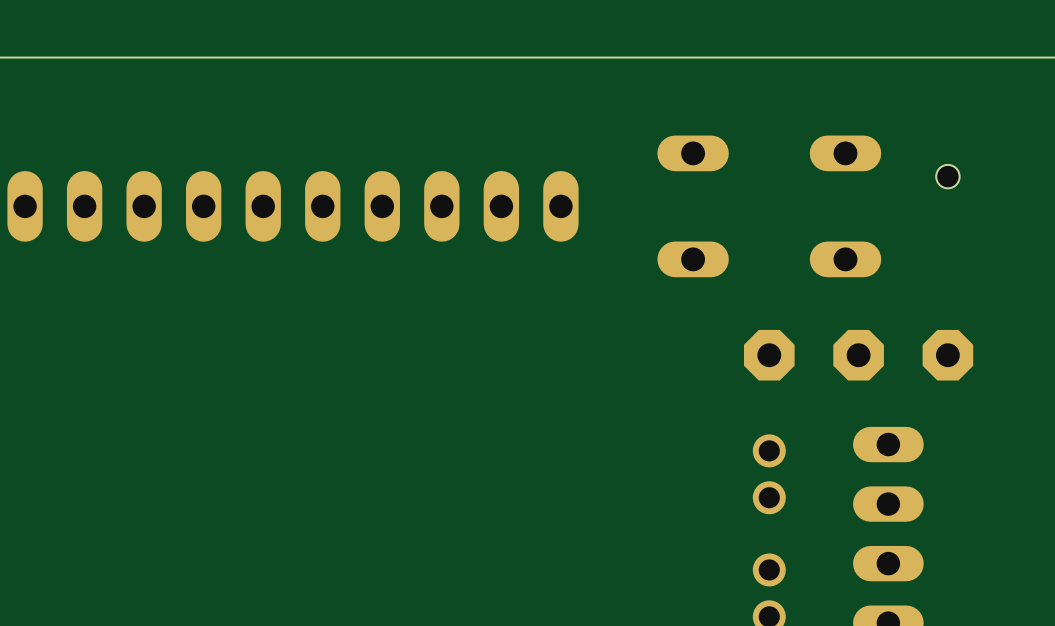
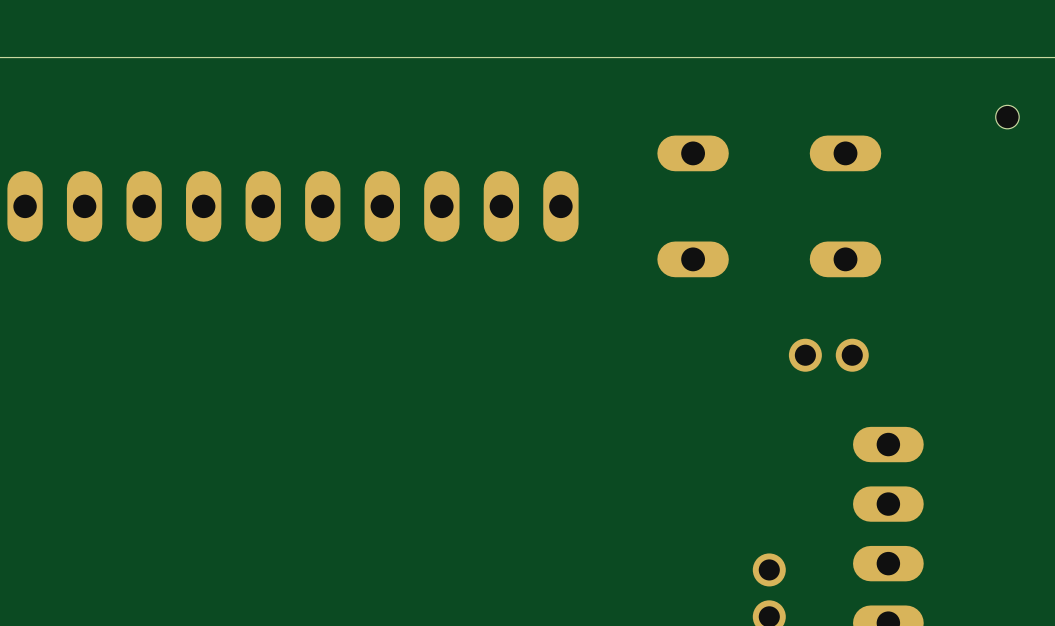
hole position: (947, 176) -> (1007, 117)
part: (769, 355) -> none
part: (858, 355) -> none
part: (947, 355) -> none
part rotation: 0° (769, 474) -> 90° clockwise (828, 355)
part position: (769, 474) -> (828, 355)

